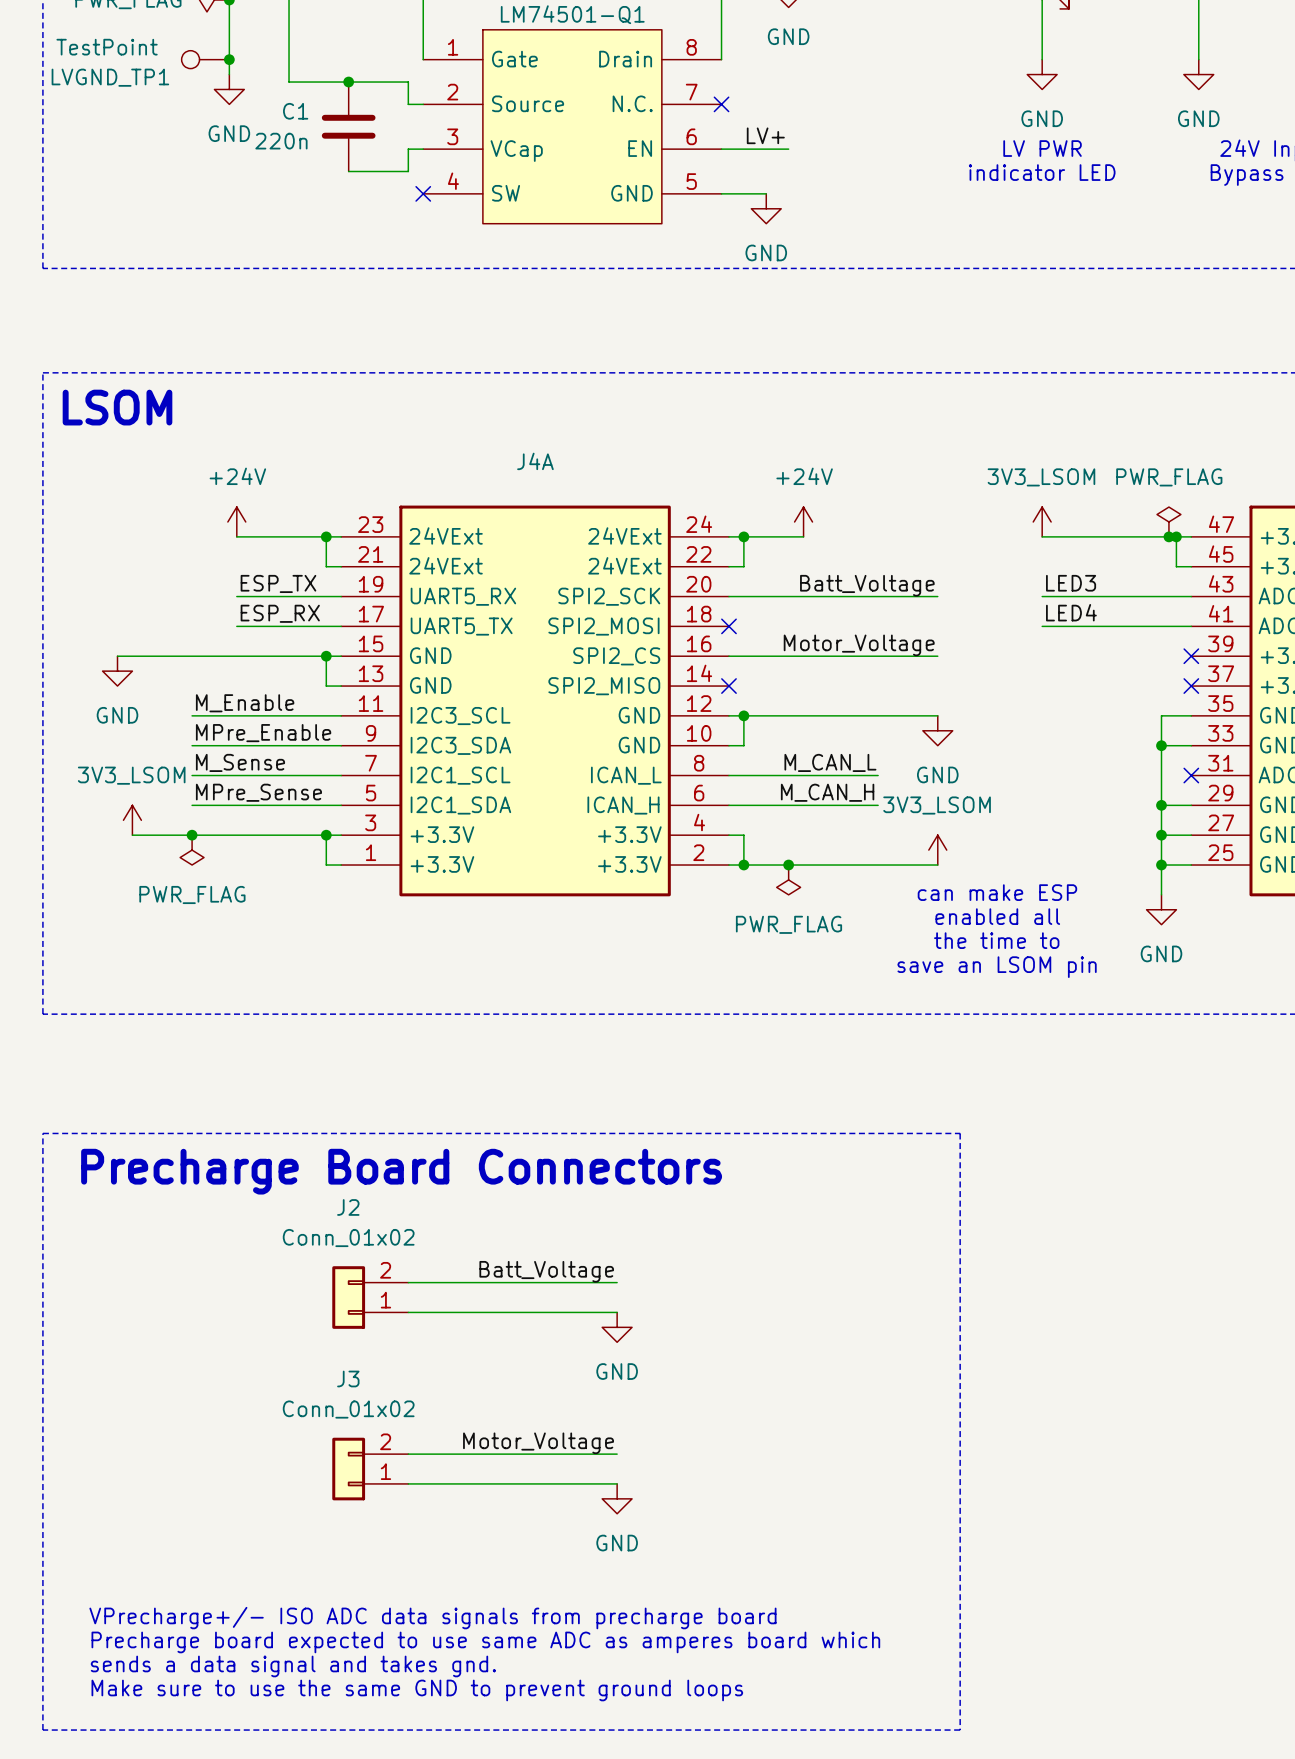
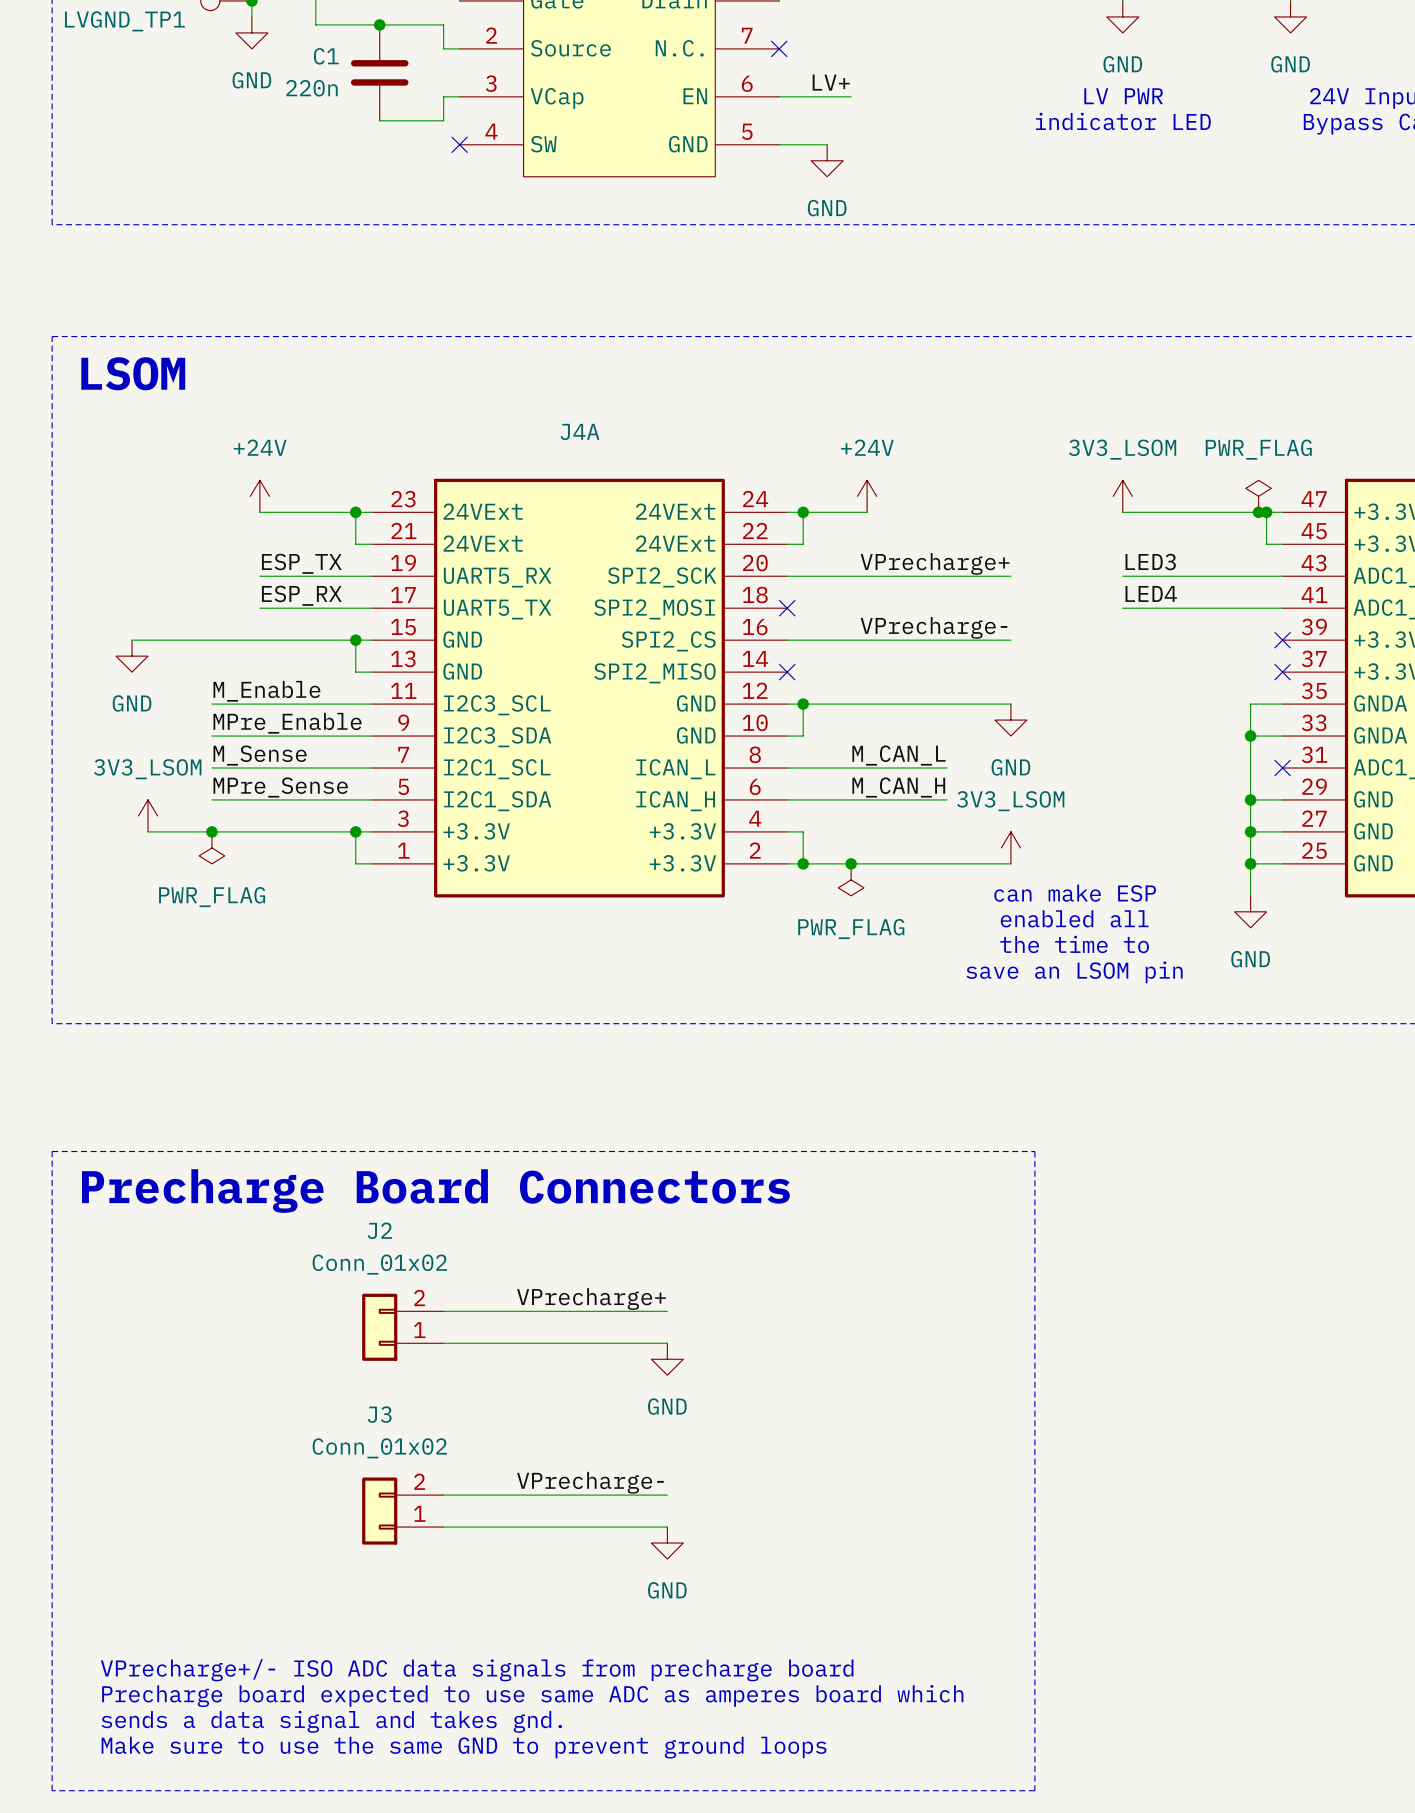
label: Batt_Voltage (867, 585) -> VPrecharge+ (935, 563)
label: Motor_Voltage (859, 645) -> VPrecharge- (934, 627)
label: Batt_Voltage (546, 1271) -> VPrecharge+ (591, 1299)
label: Motor_Voltage (538, 1443) -> VPrecharge- (590, 1482)

